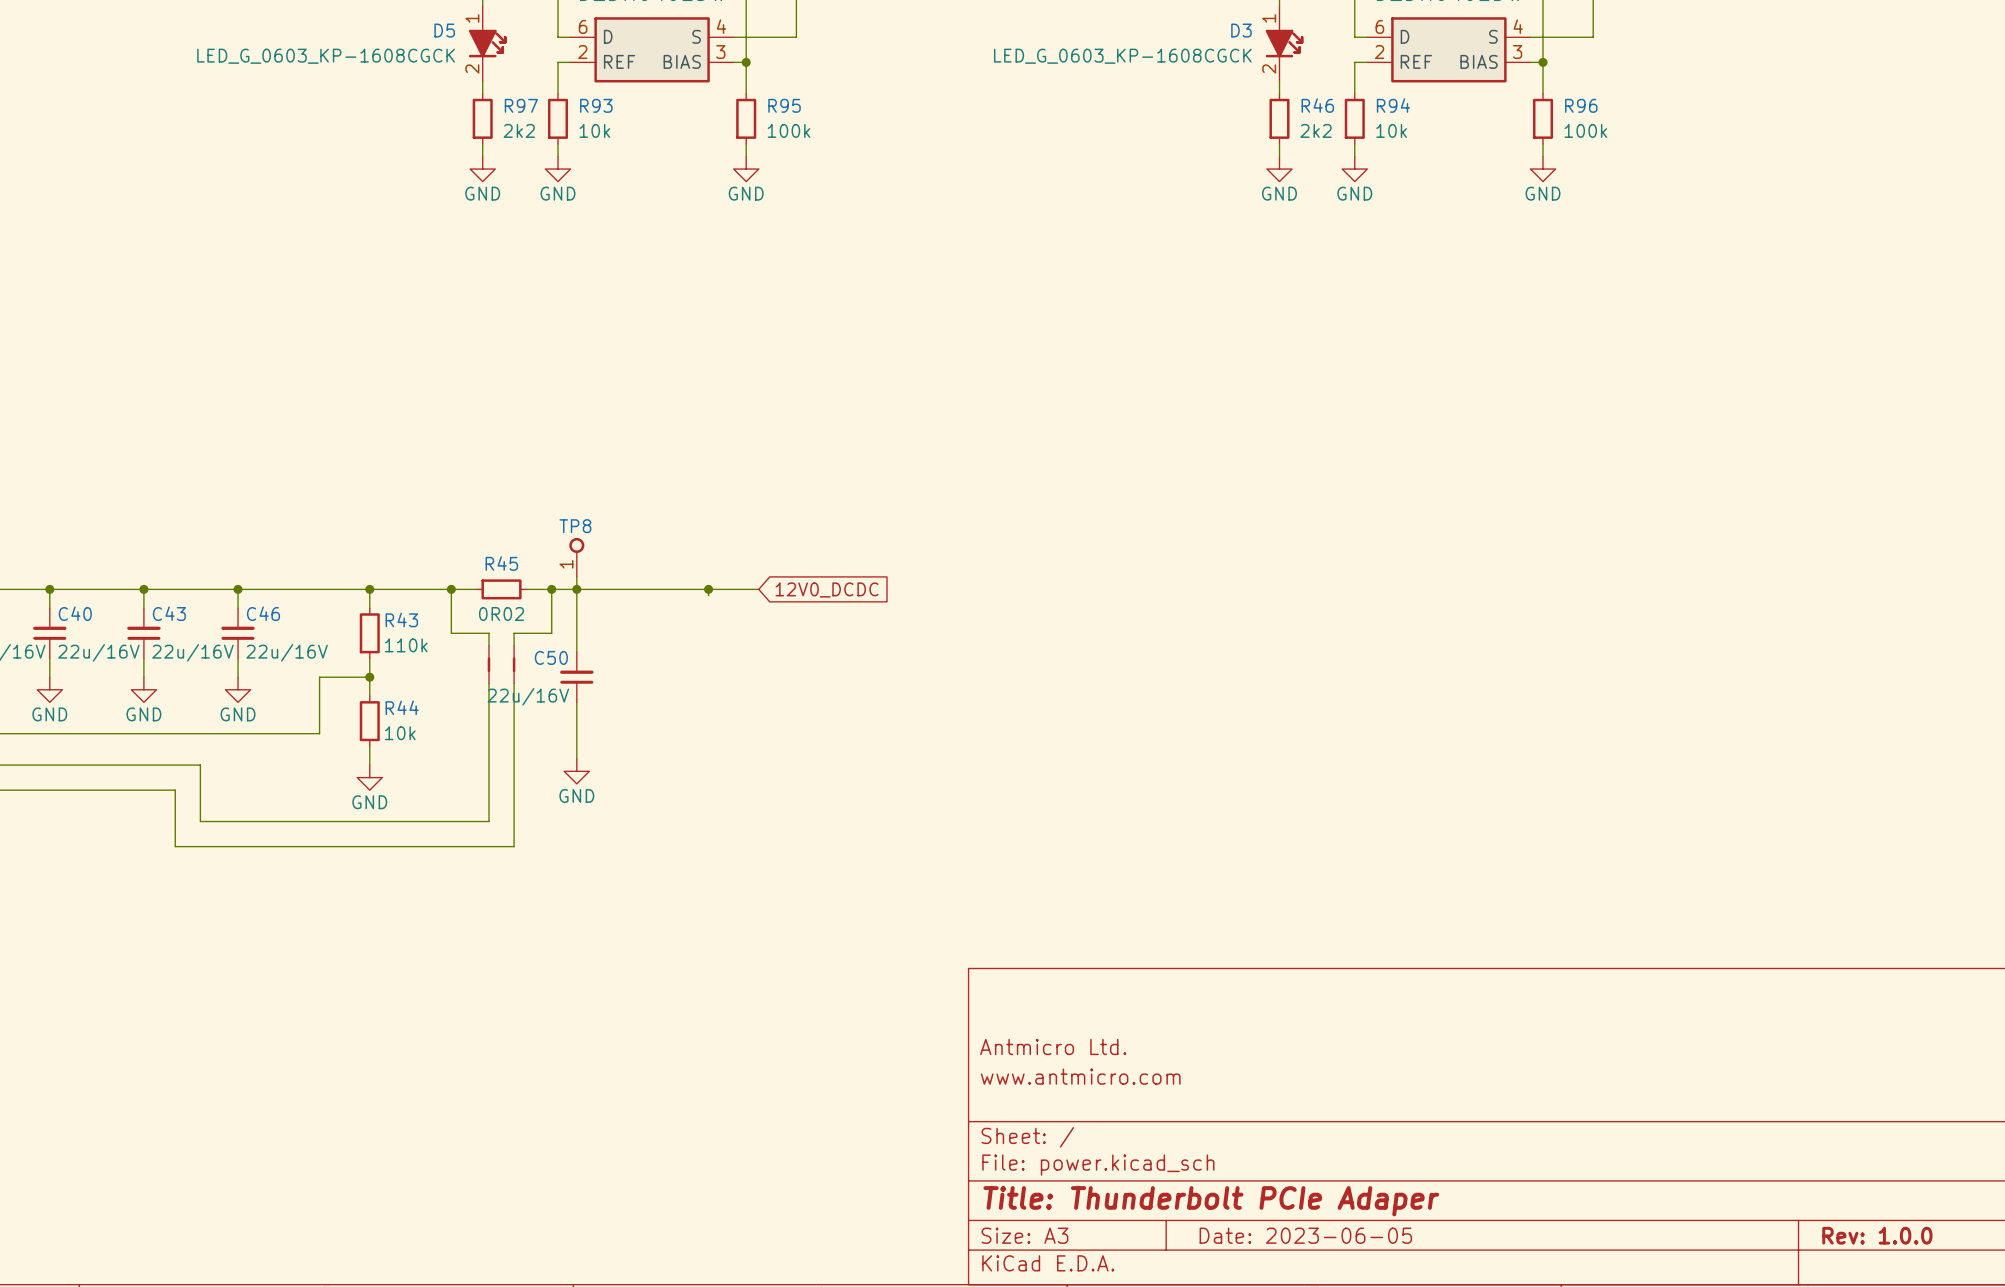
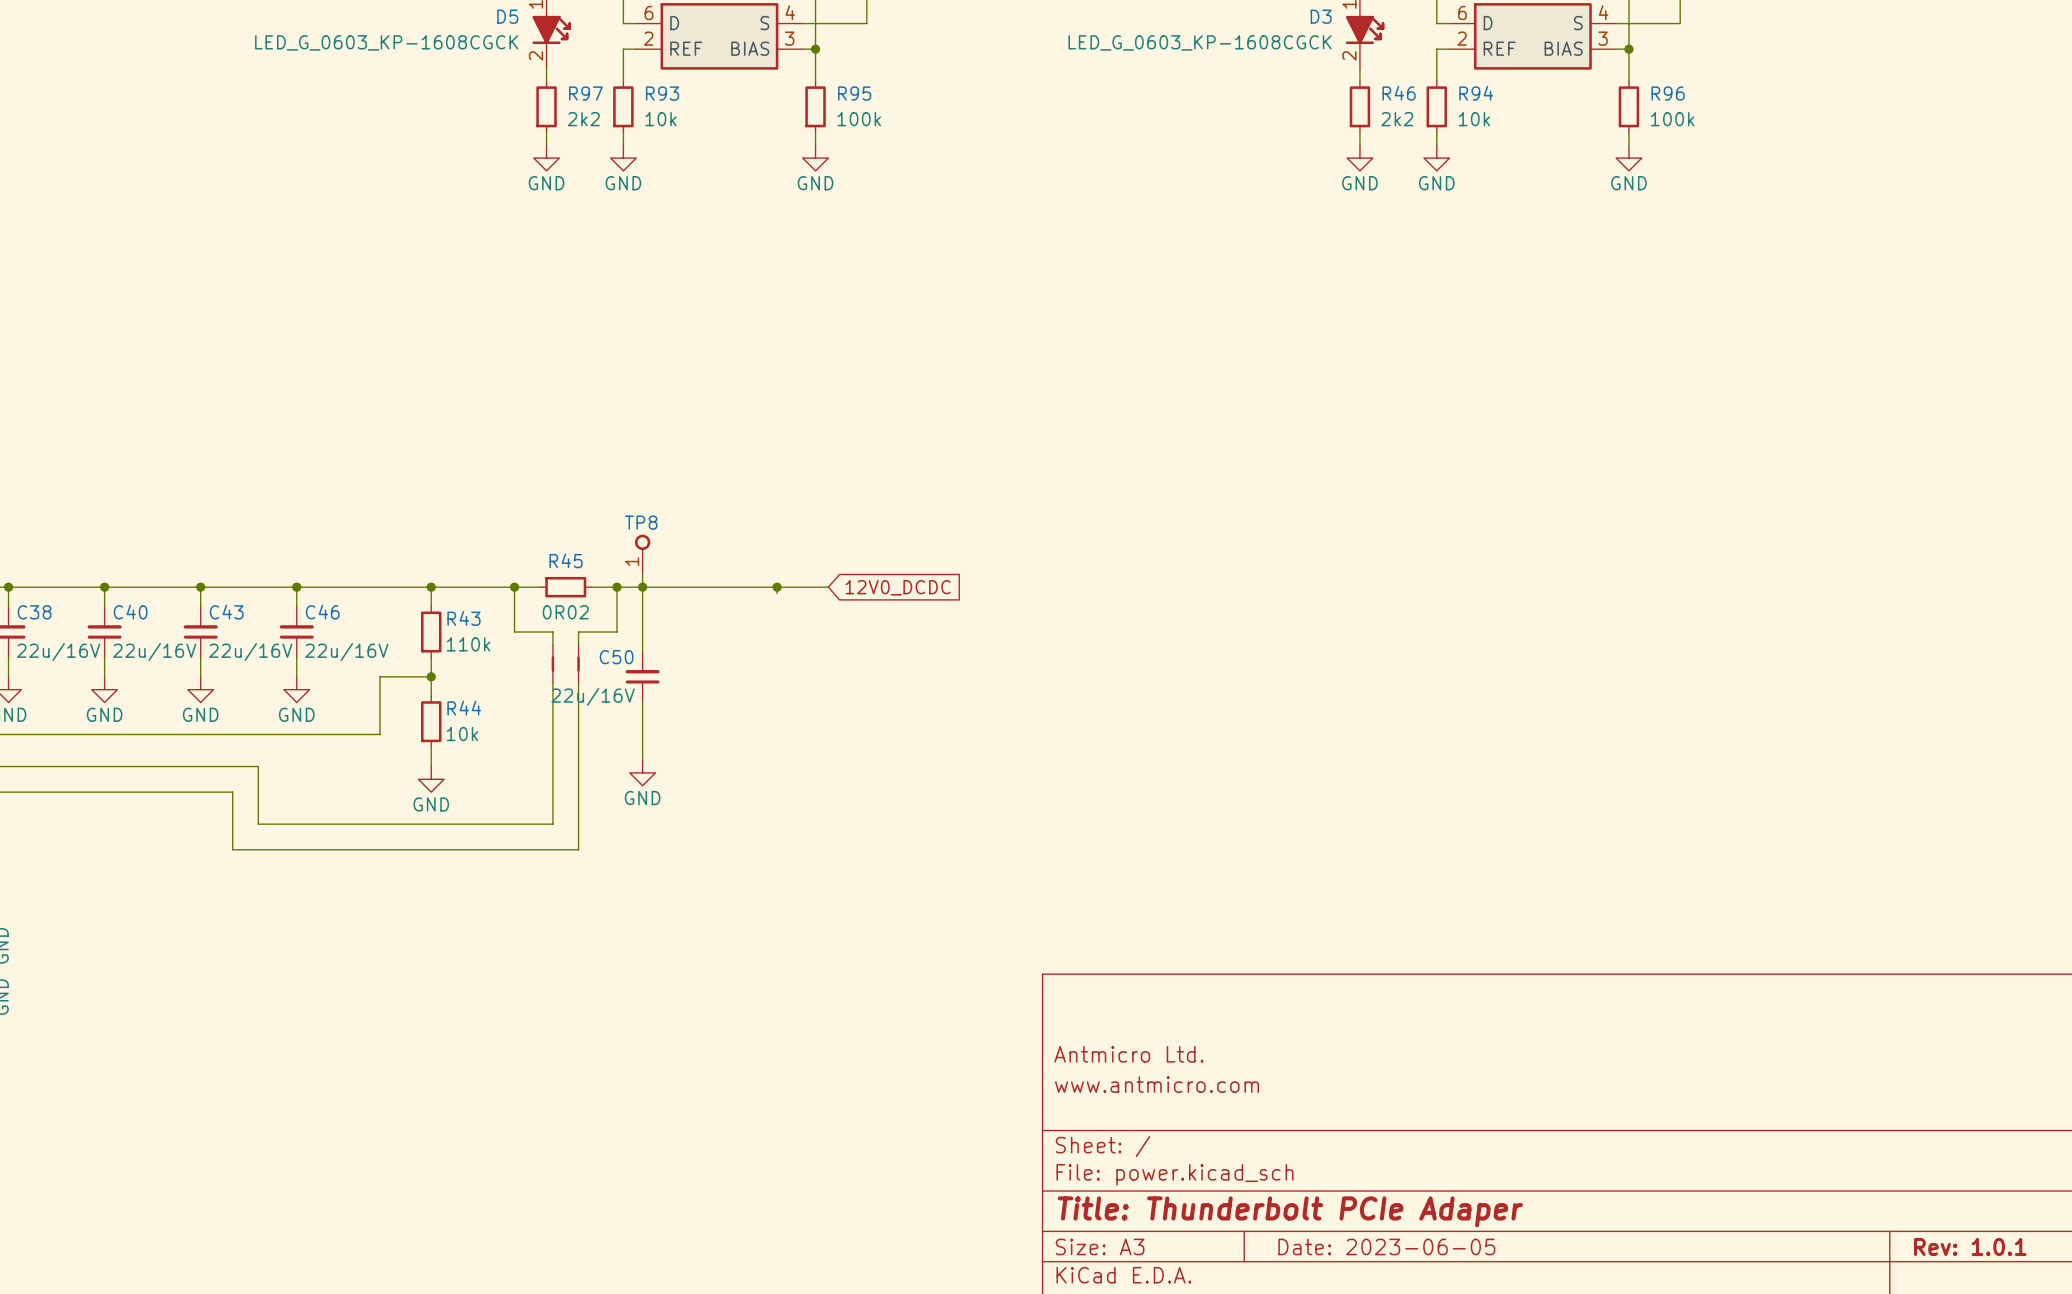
title block: Rev: 1.0.0 (1877, 1235) -> Rev: 1.0.1 (1970, 1246)

